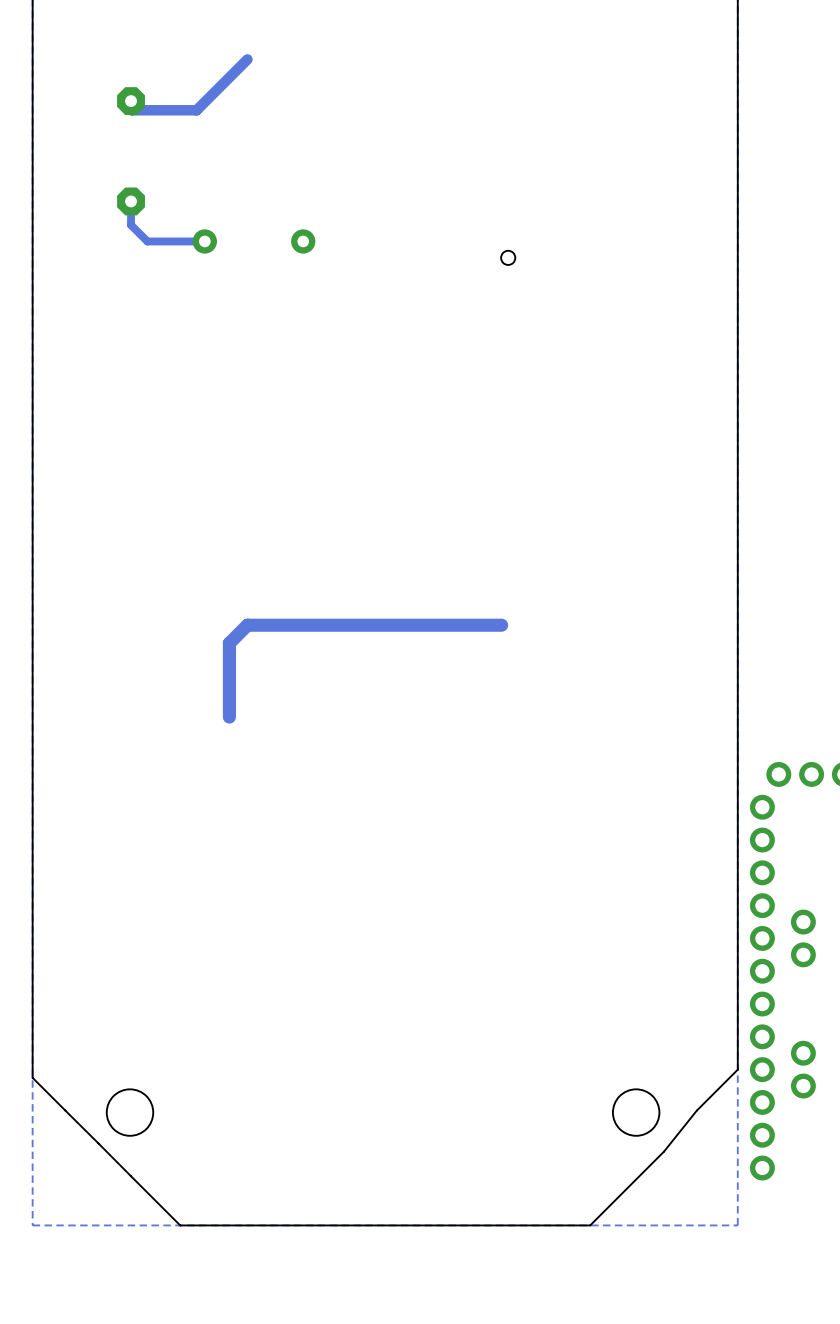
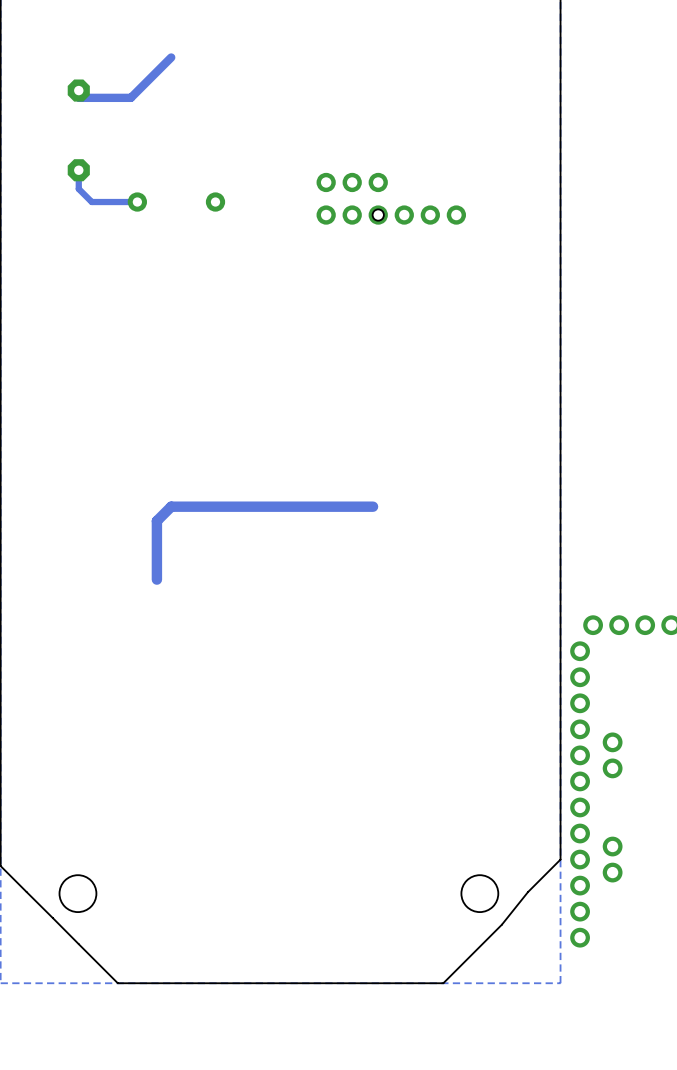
part: none -> (352, 182)
part: none -> (352, 215)
part: none -> (430, 215)

